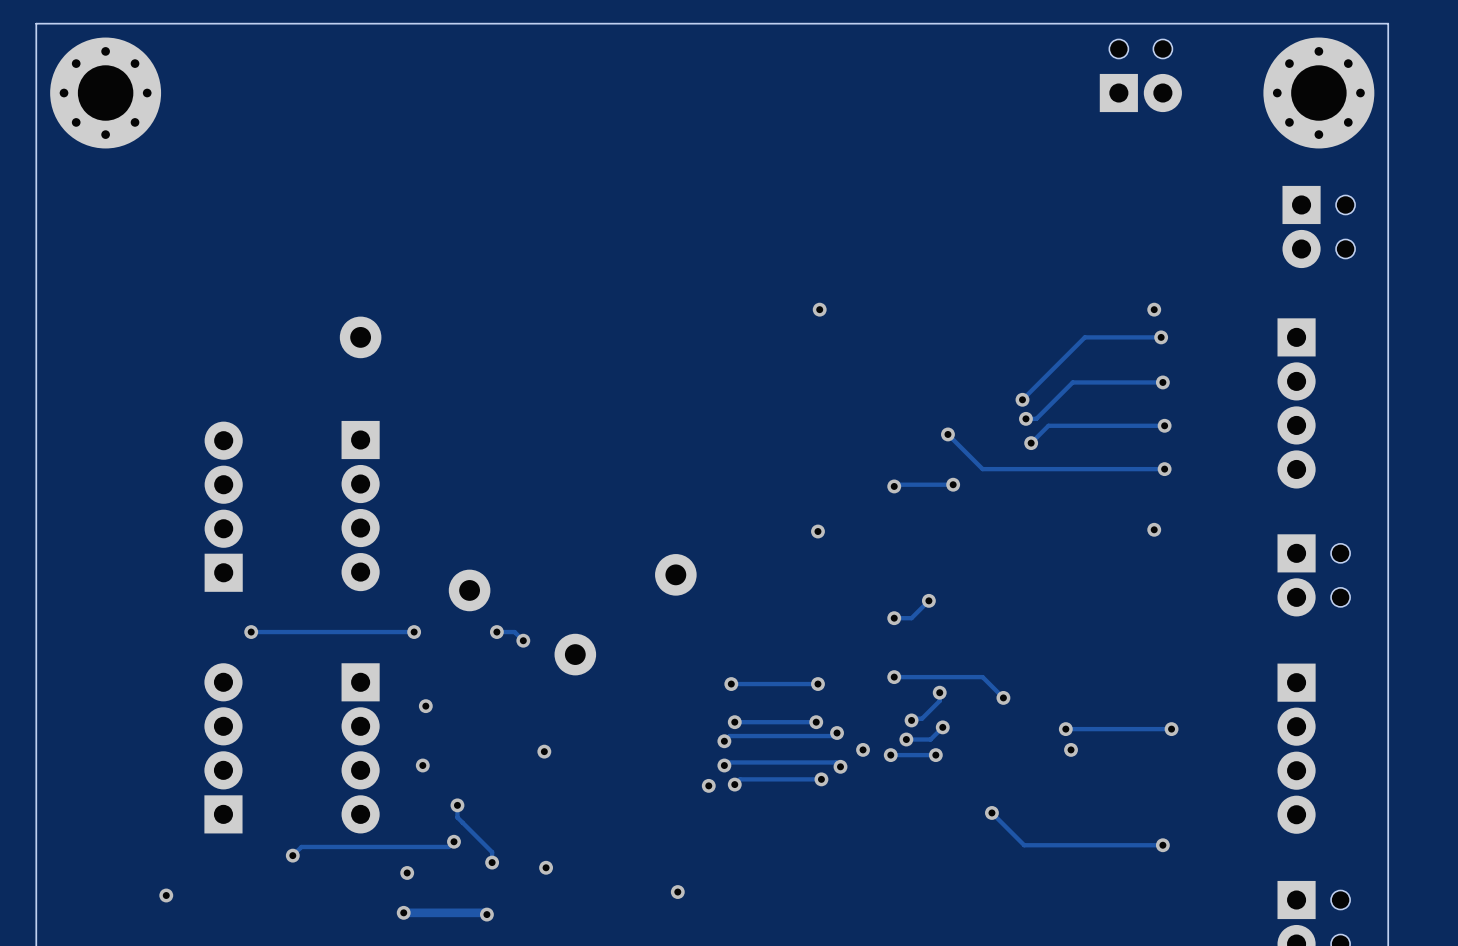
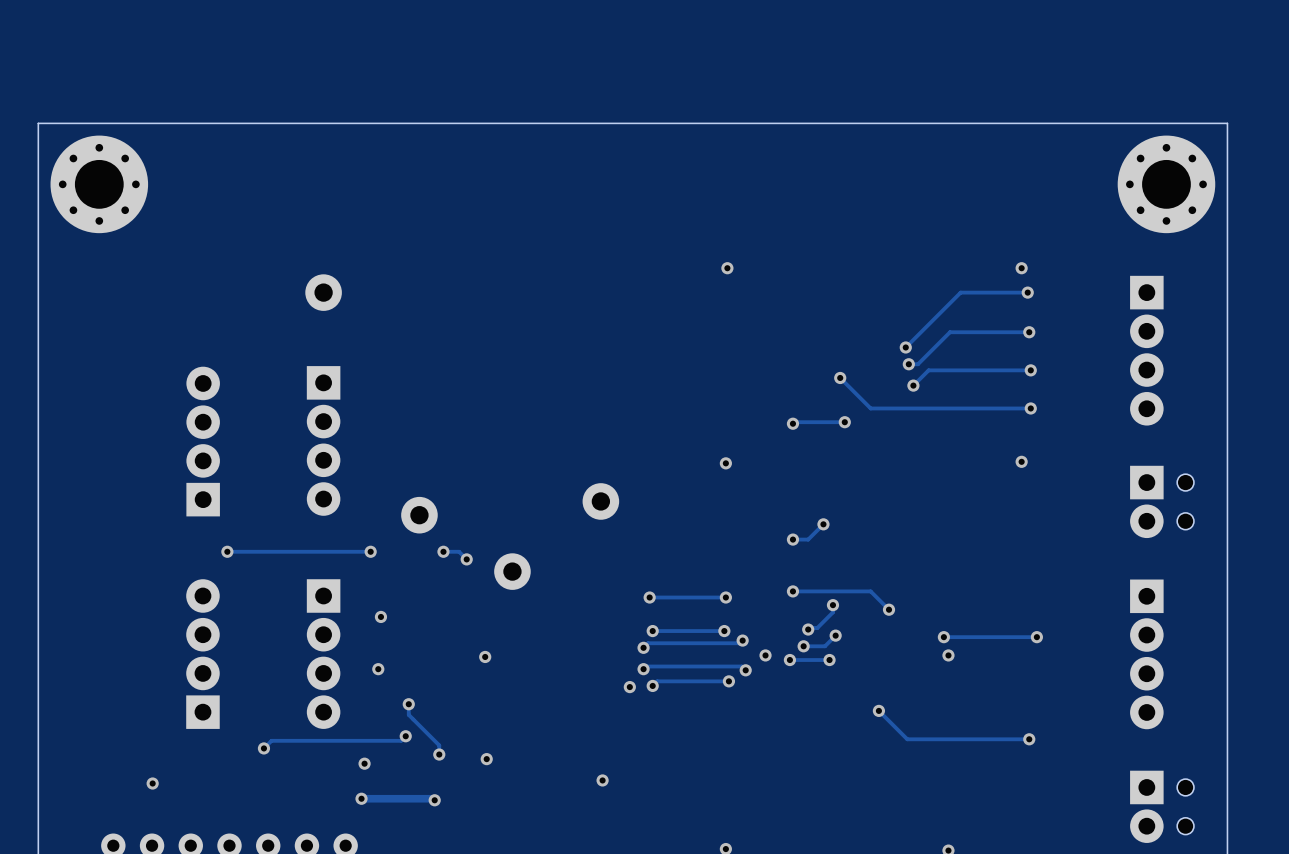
part: (1140, 75) -> none
part position: (105, 93) -> (99, 184)
part: (1318, 93) -> none
board edge: (1388, 145) (1388, 23) (36, 23) (36, 145) -> (1227, 123) (38, 123)
part footprint: [1282, 185, 1356, 269] -> [1117, 135, 1216, 234]

